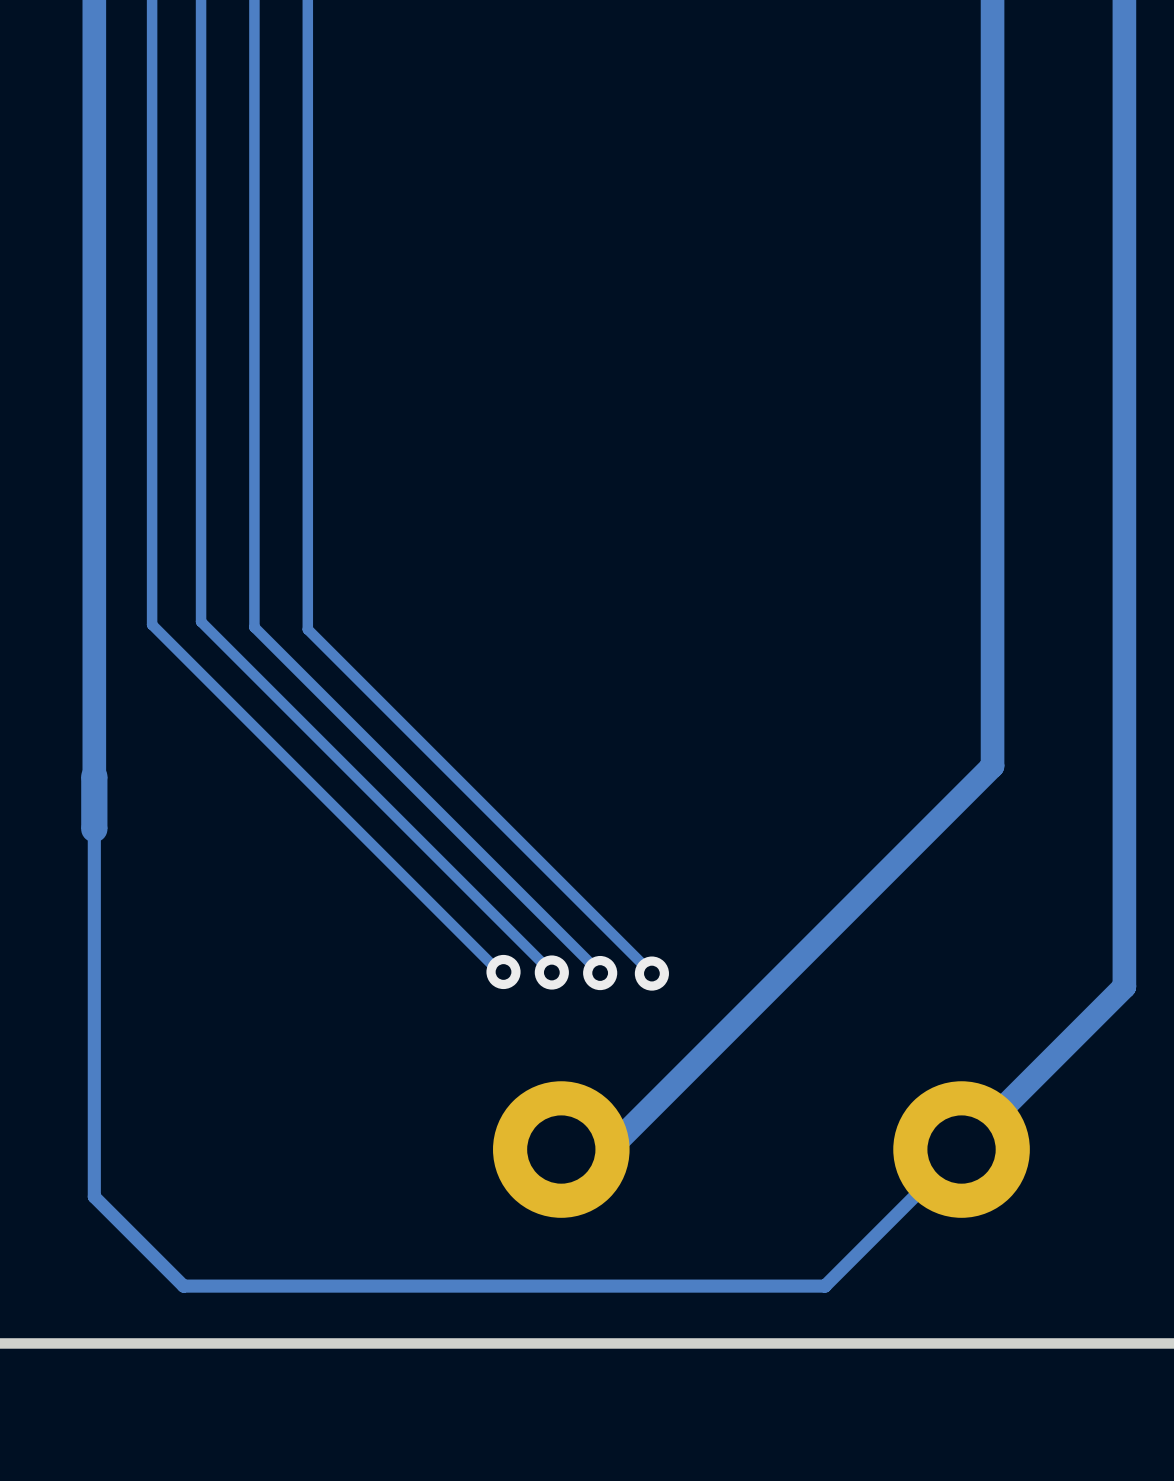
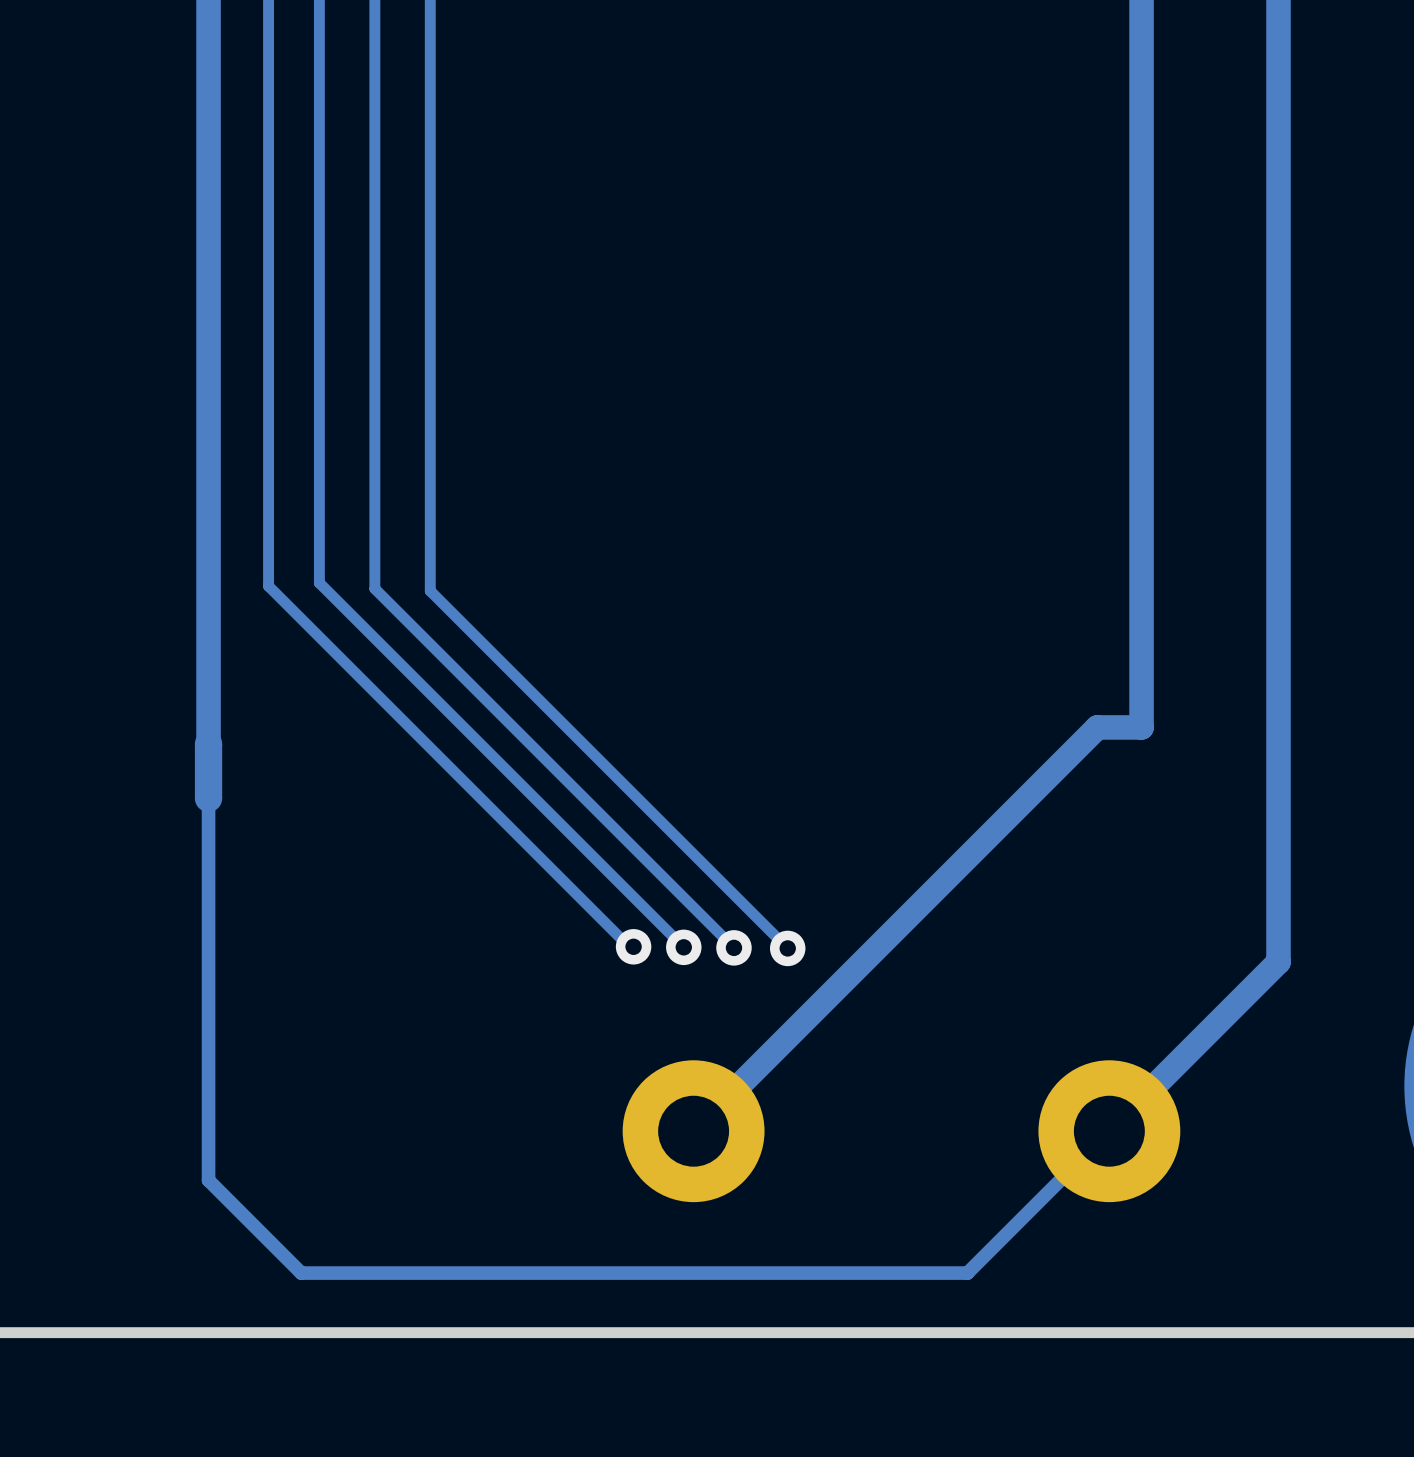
track: (992, 760) (992, 766) (609, 1149) (561, 1149) -> (1141, 727) (1097, 727) (693, 1131)

